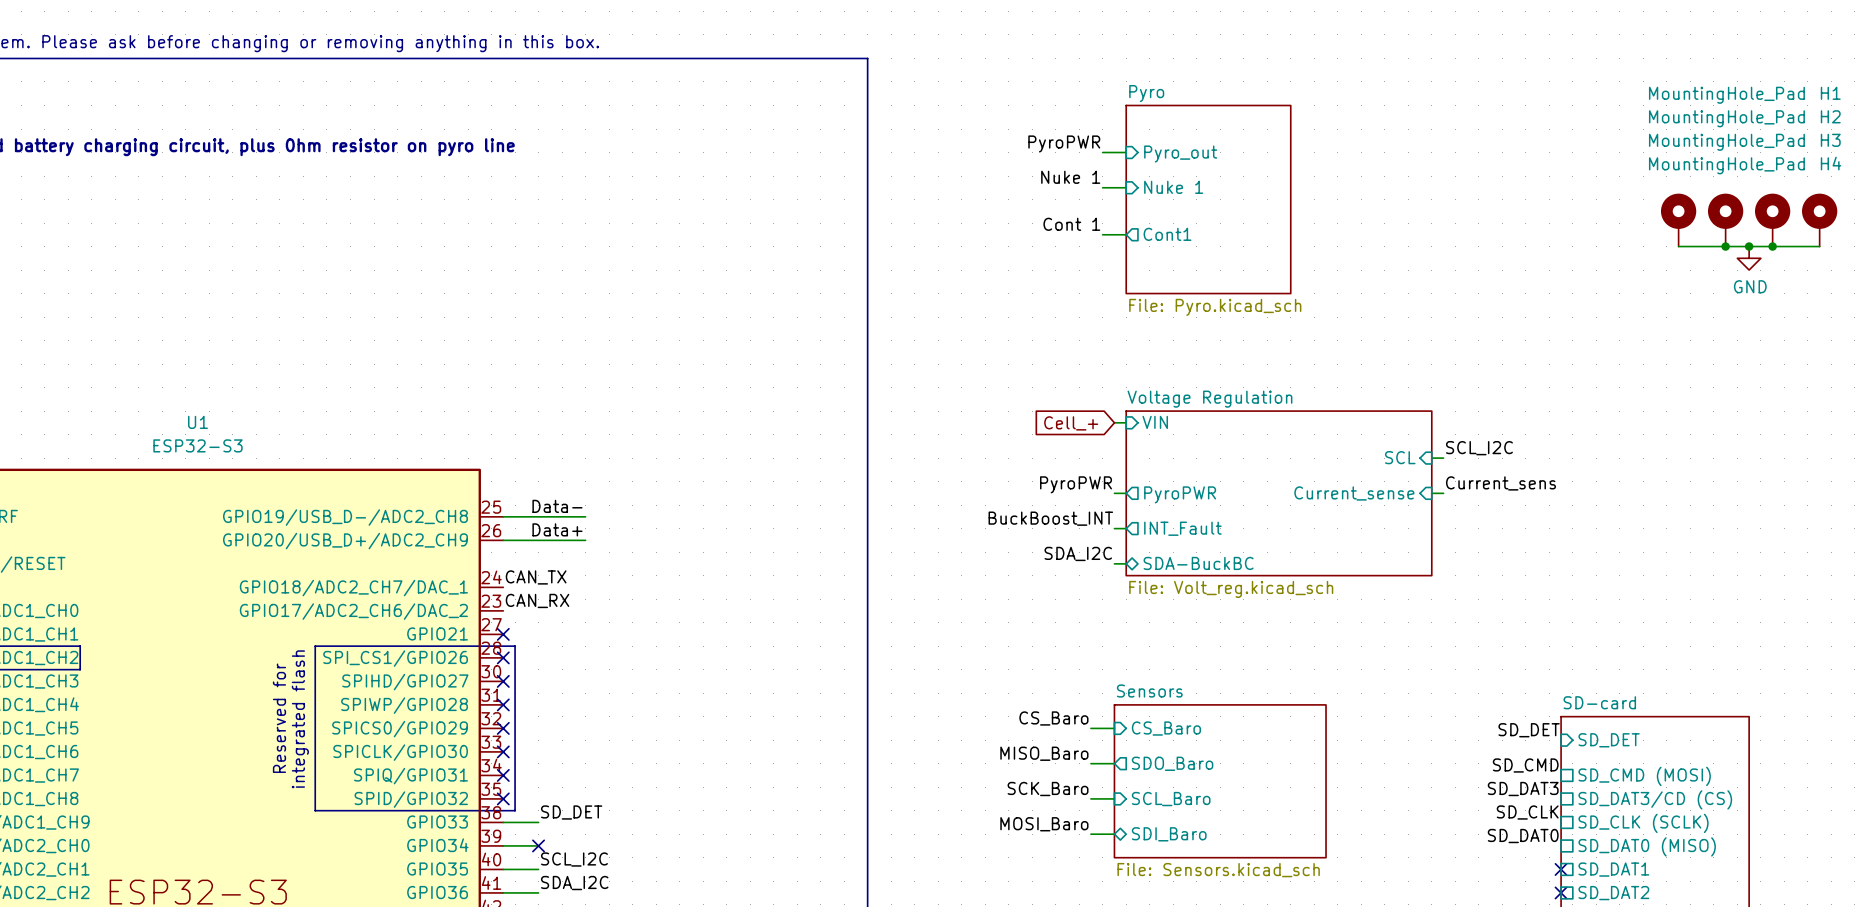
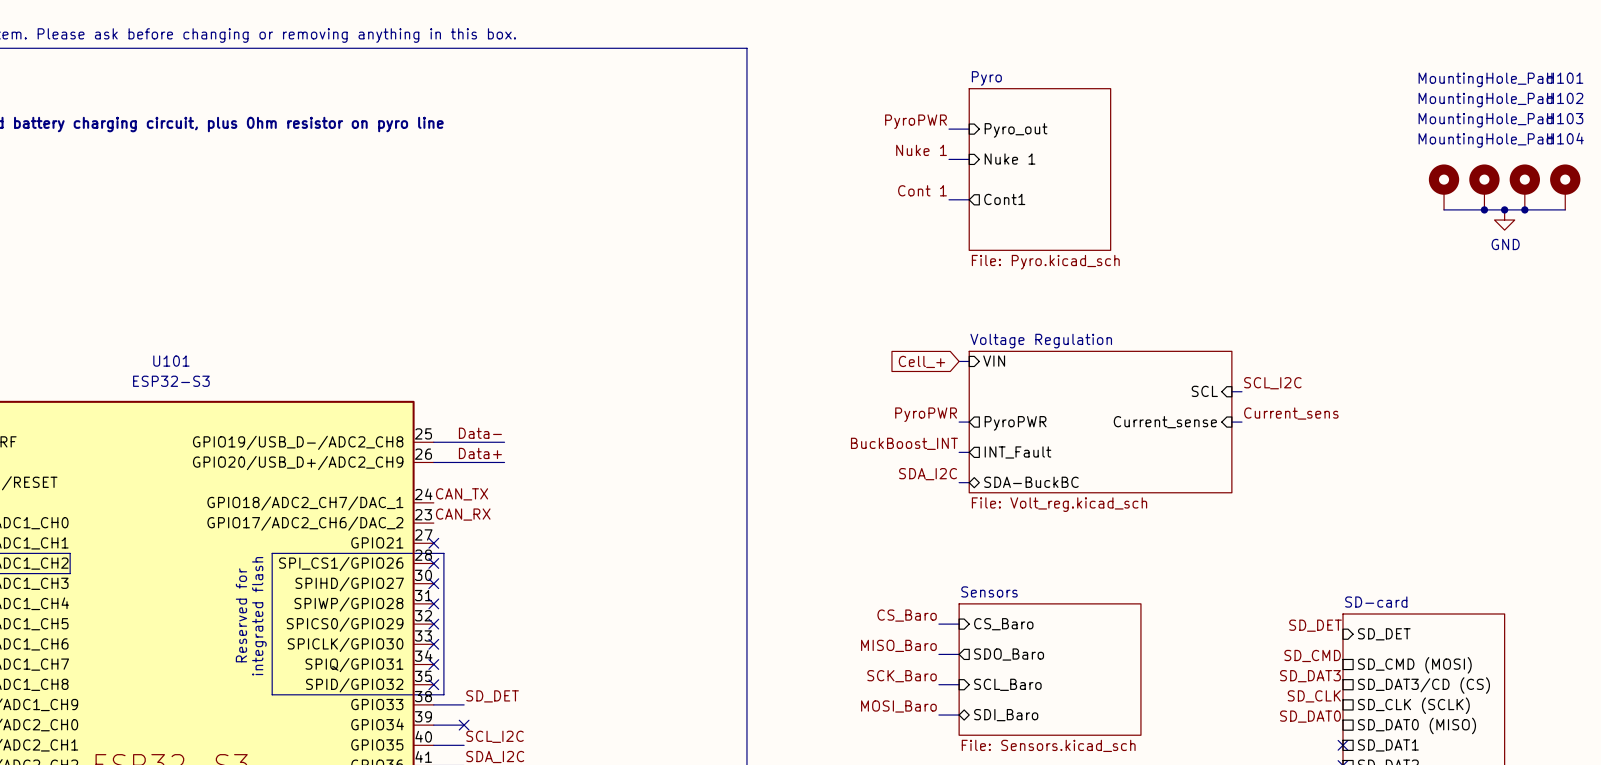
H1 name: H1 (1830, 93) -> H101 (1565, 78)
H2 name: H2 (1830, 116) -> H102 (1565, 98)
H3 name: H3 (1830, 140) -> H103 (1565, 118)
H4 name: H4 (1831, 163) -> H104 (1565, 138)
U1 name: U1 (197, 422) -> U101 (171, 361)

